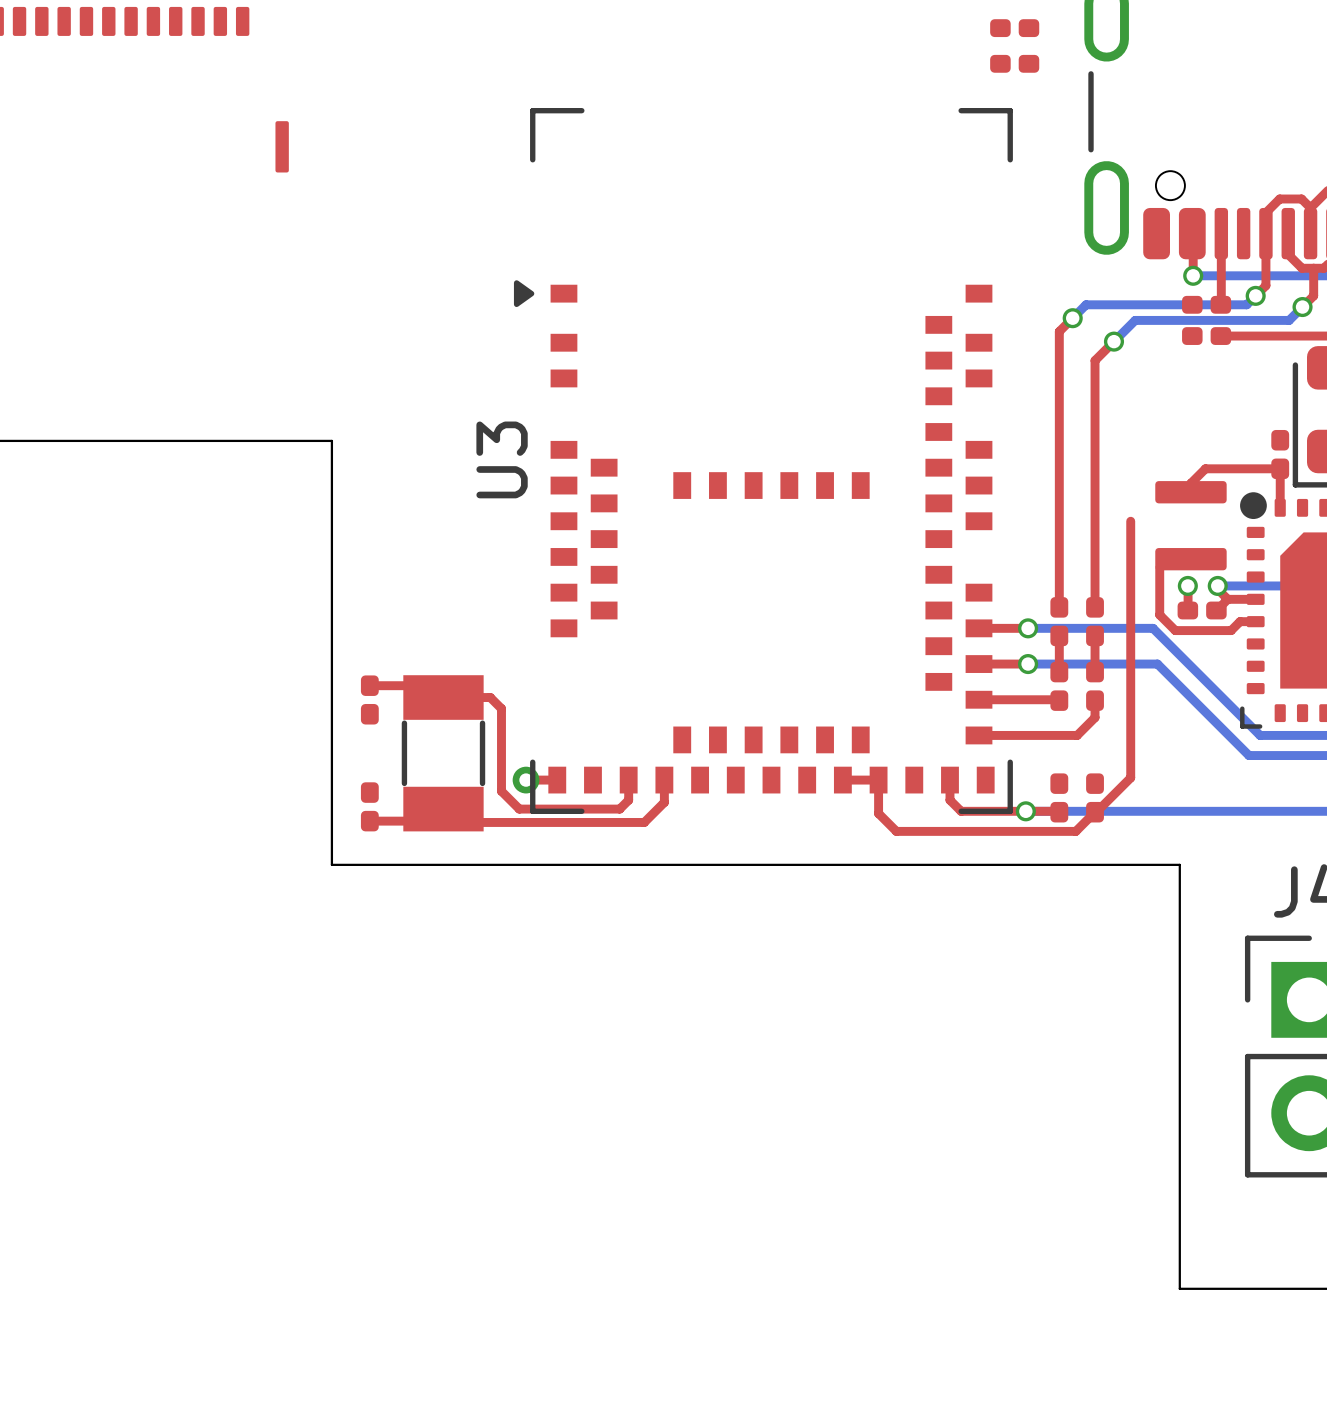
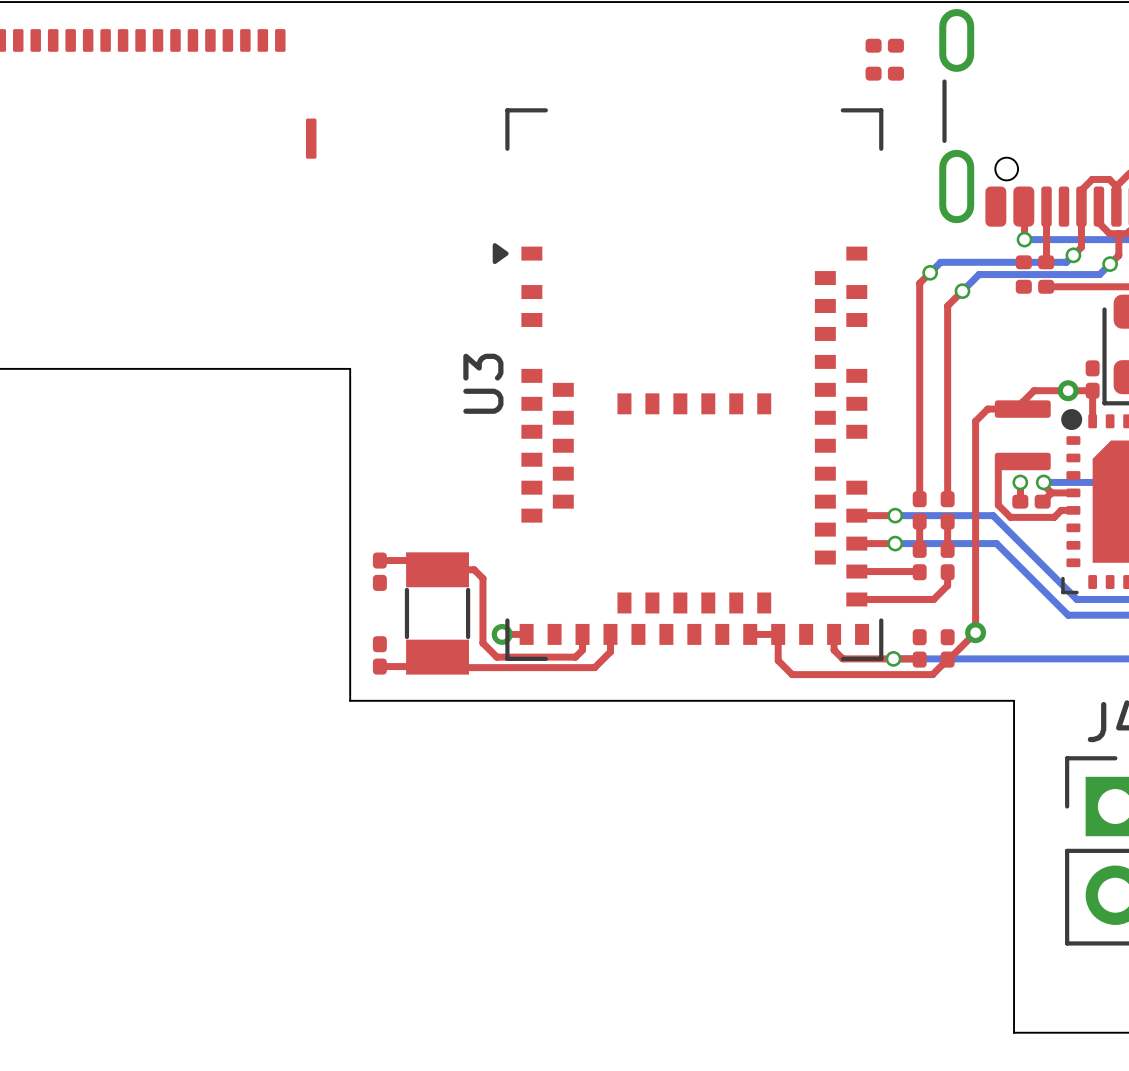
via: none -> (1068, 390)
top track: none -> (1022, 409) (987, 409) (975, 421) (975, 431)
via: none -> (975, 632)

